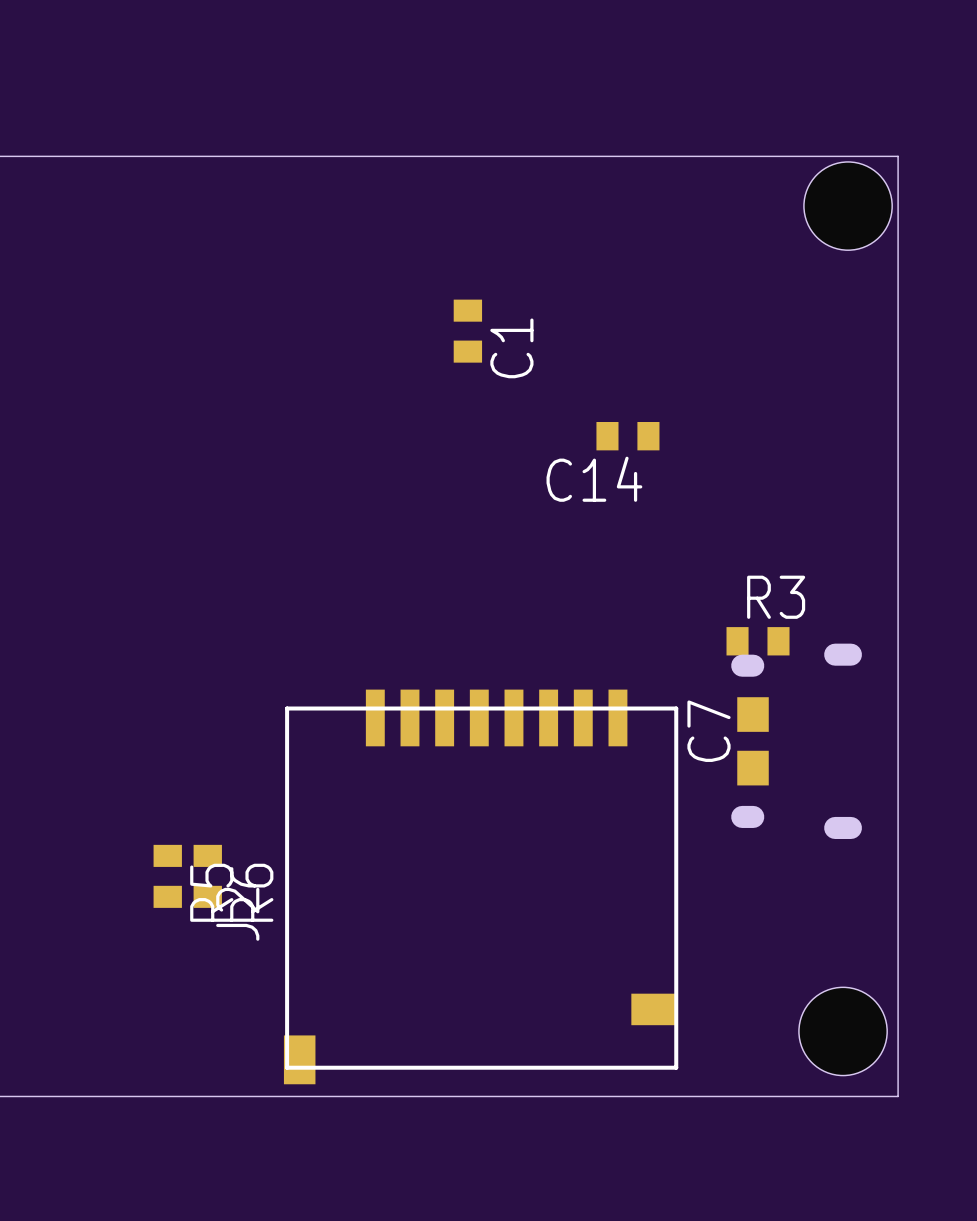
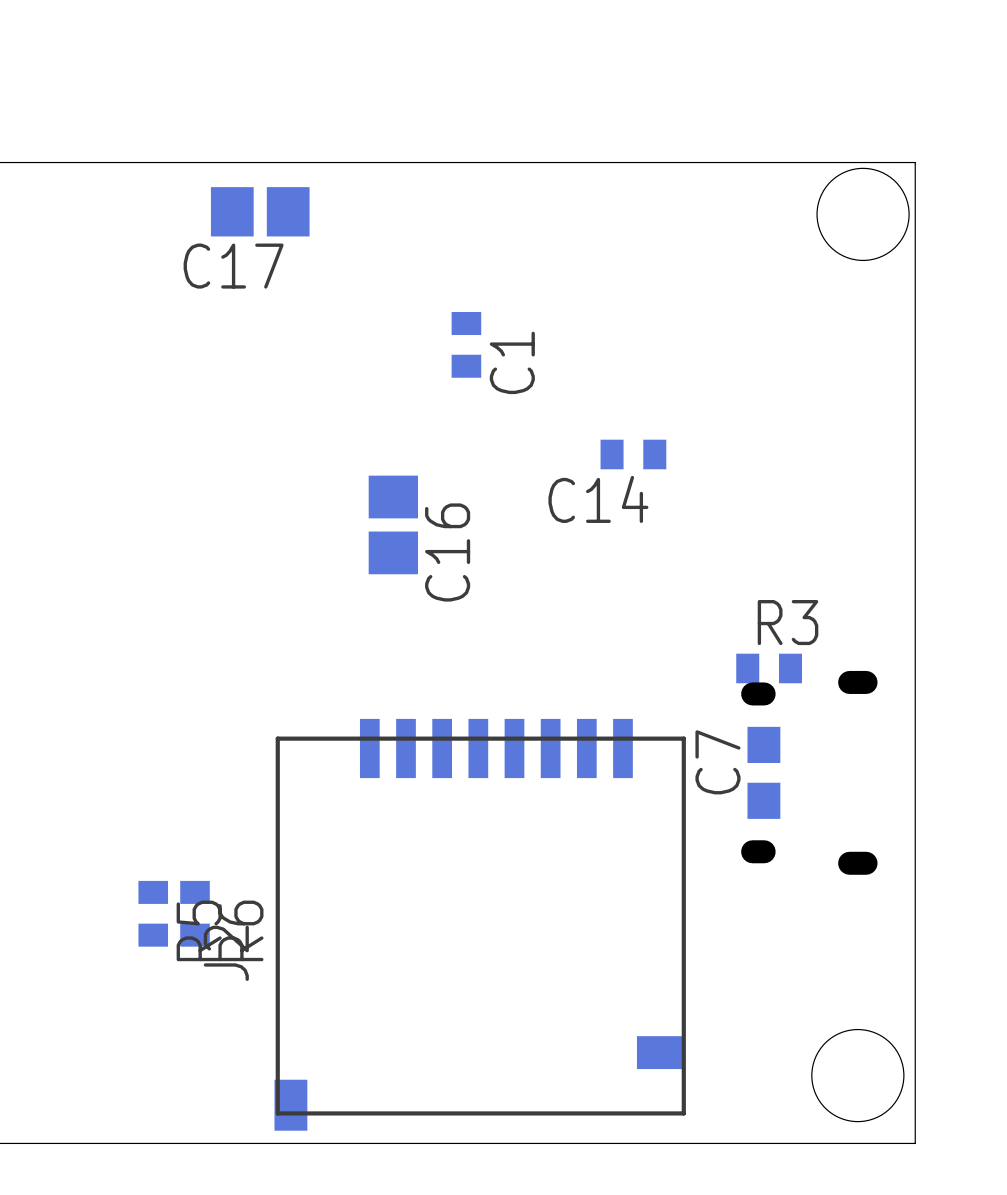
C17: none -> (260, 211)
C16: none -> (393, 524)

